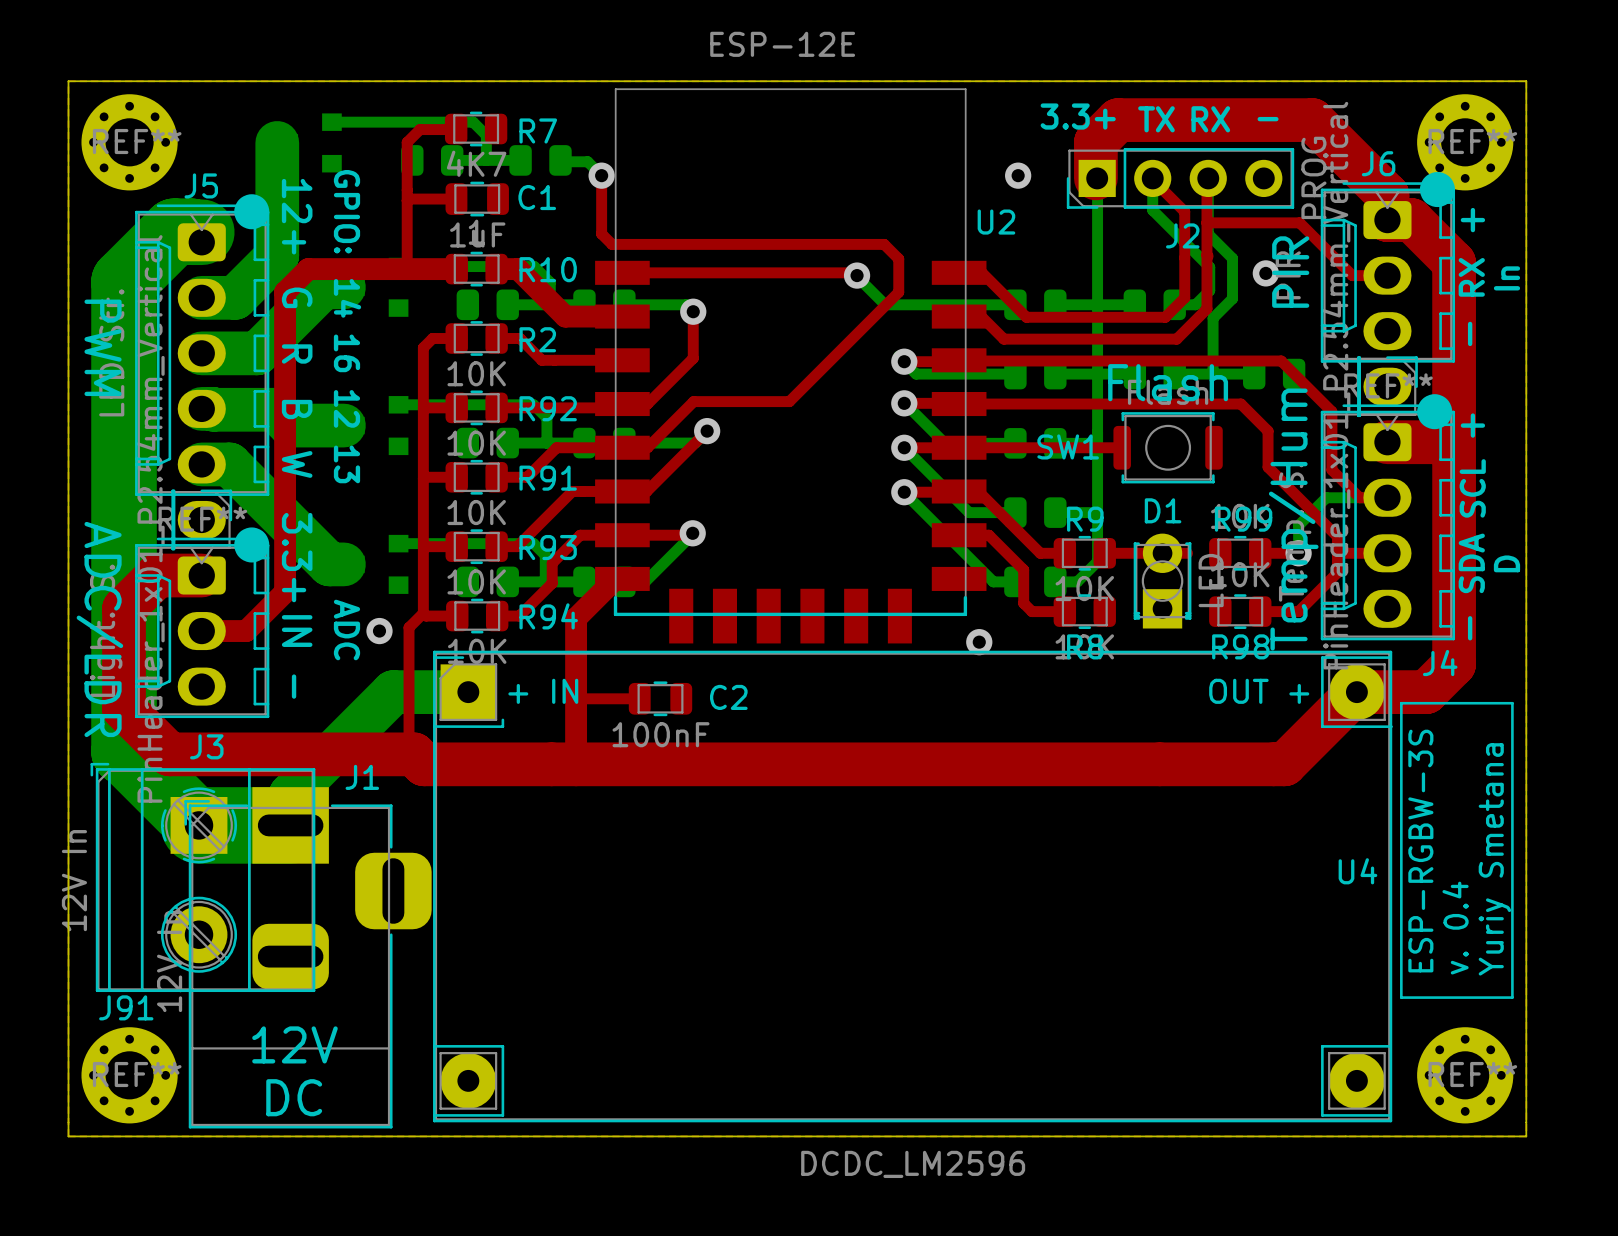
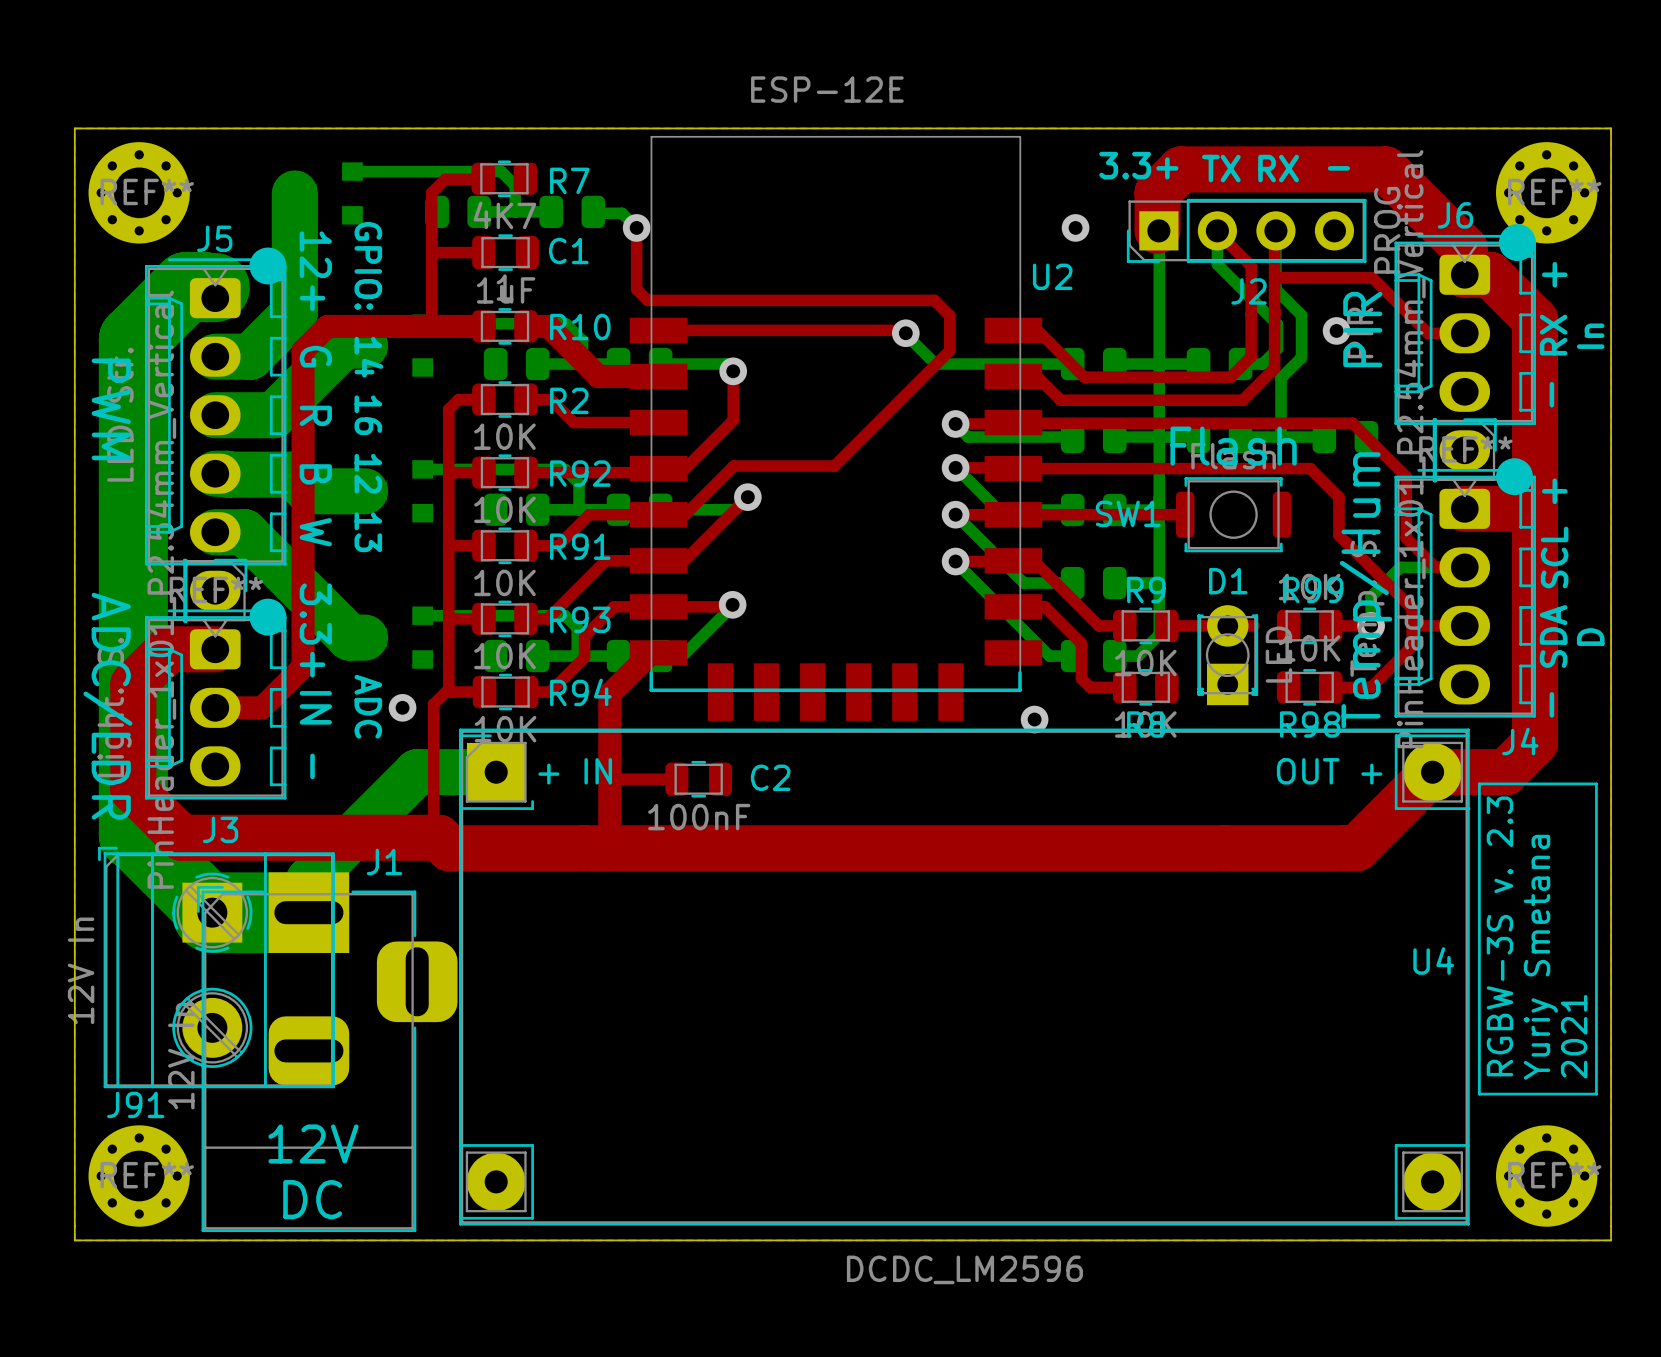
text: ESP-RGBW-3S (1420, 851) -> RGBW-3S v. 2.3 (1499, 936)
text: Yuriy Smetana (1494, 859) -> 2021 (1574, 1036)
text: v. 0.4 (1455, 928) -> Yuriy Smetana (1540, 957)

